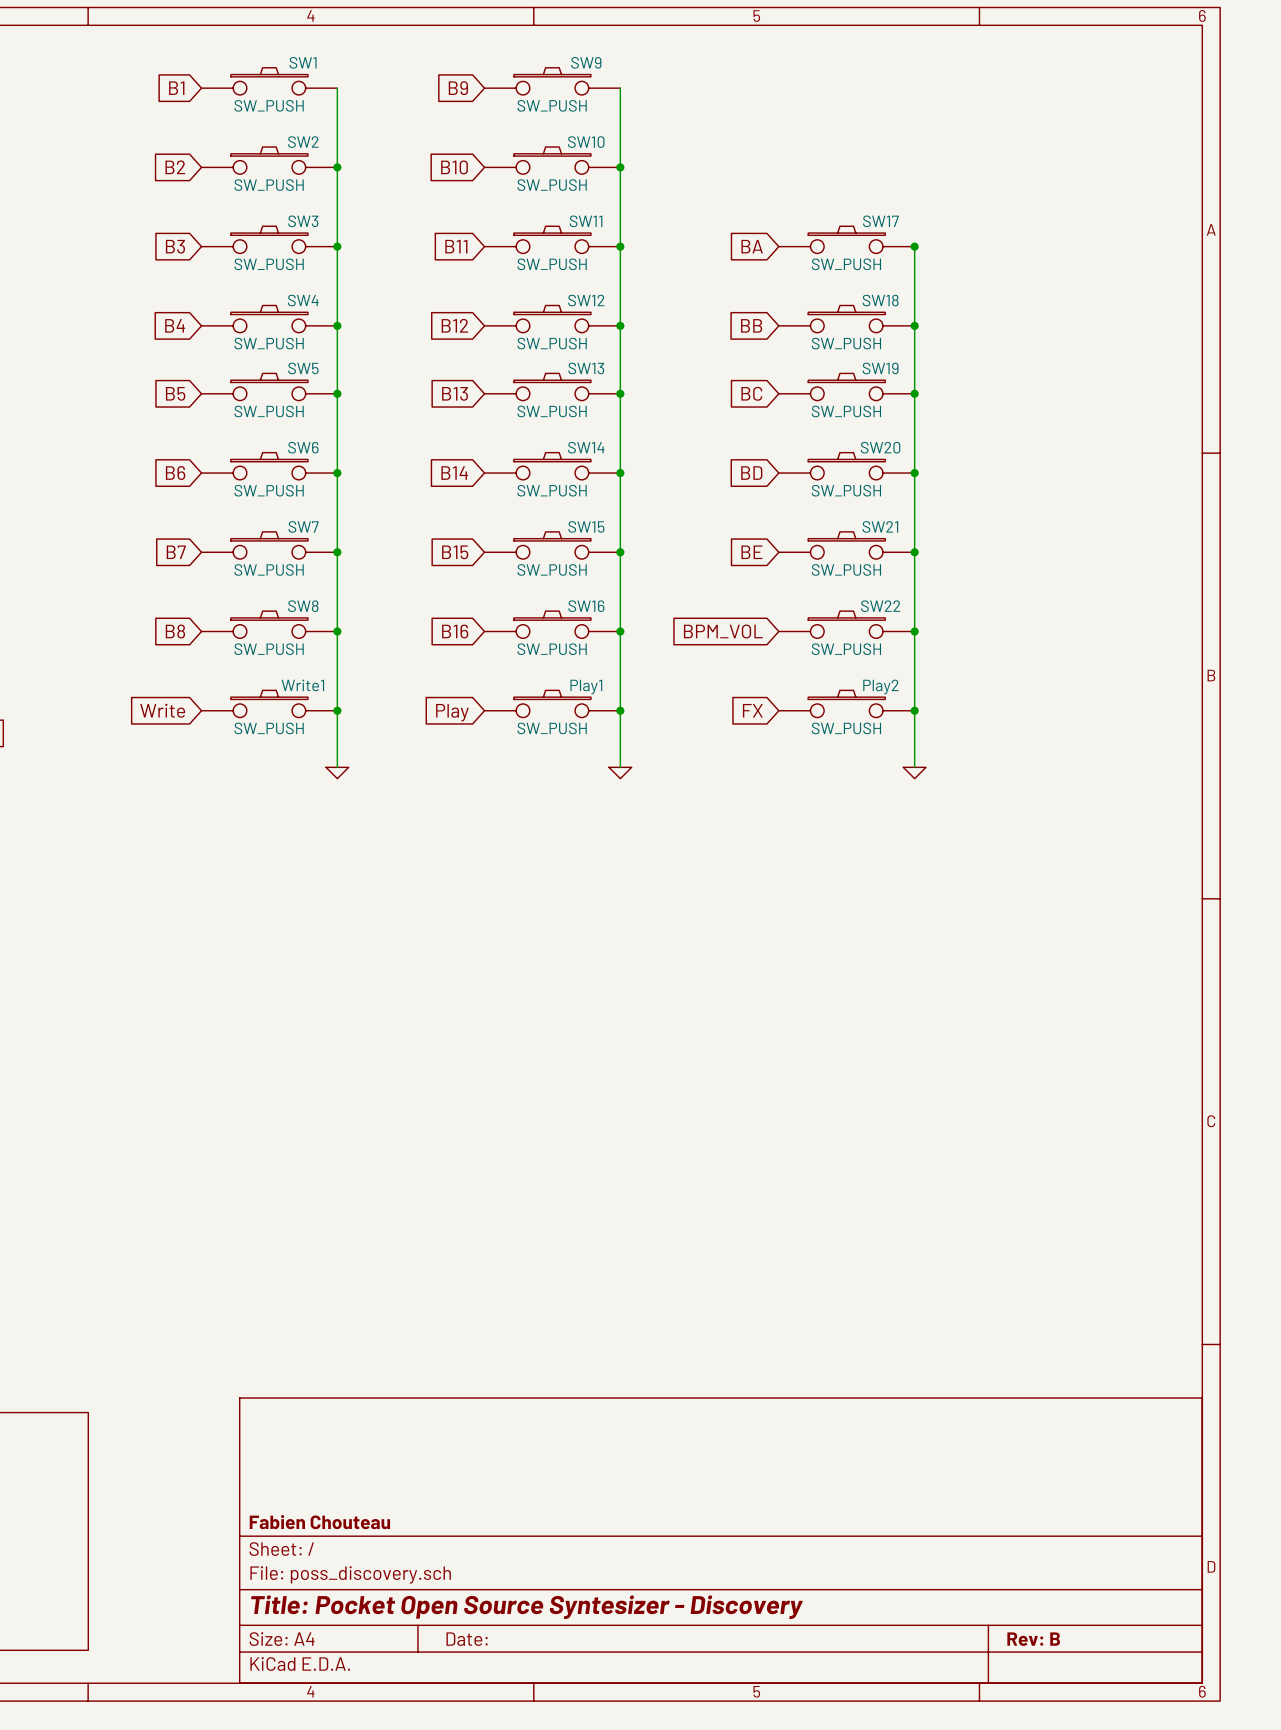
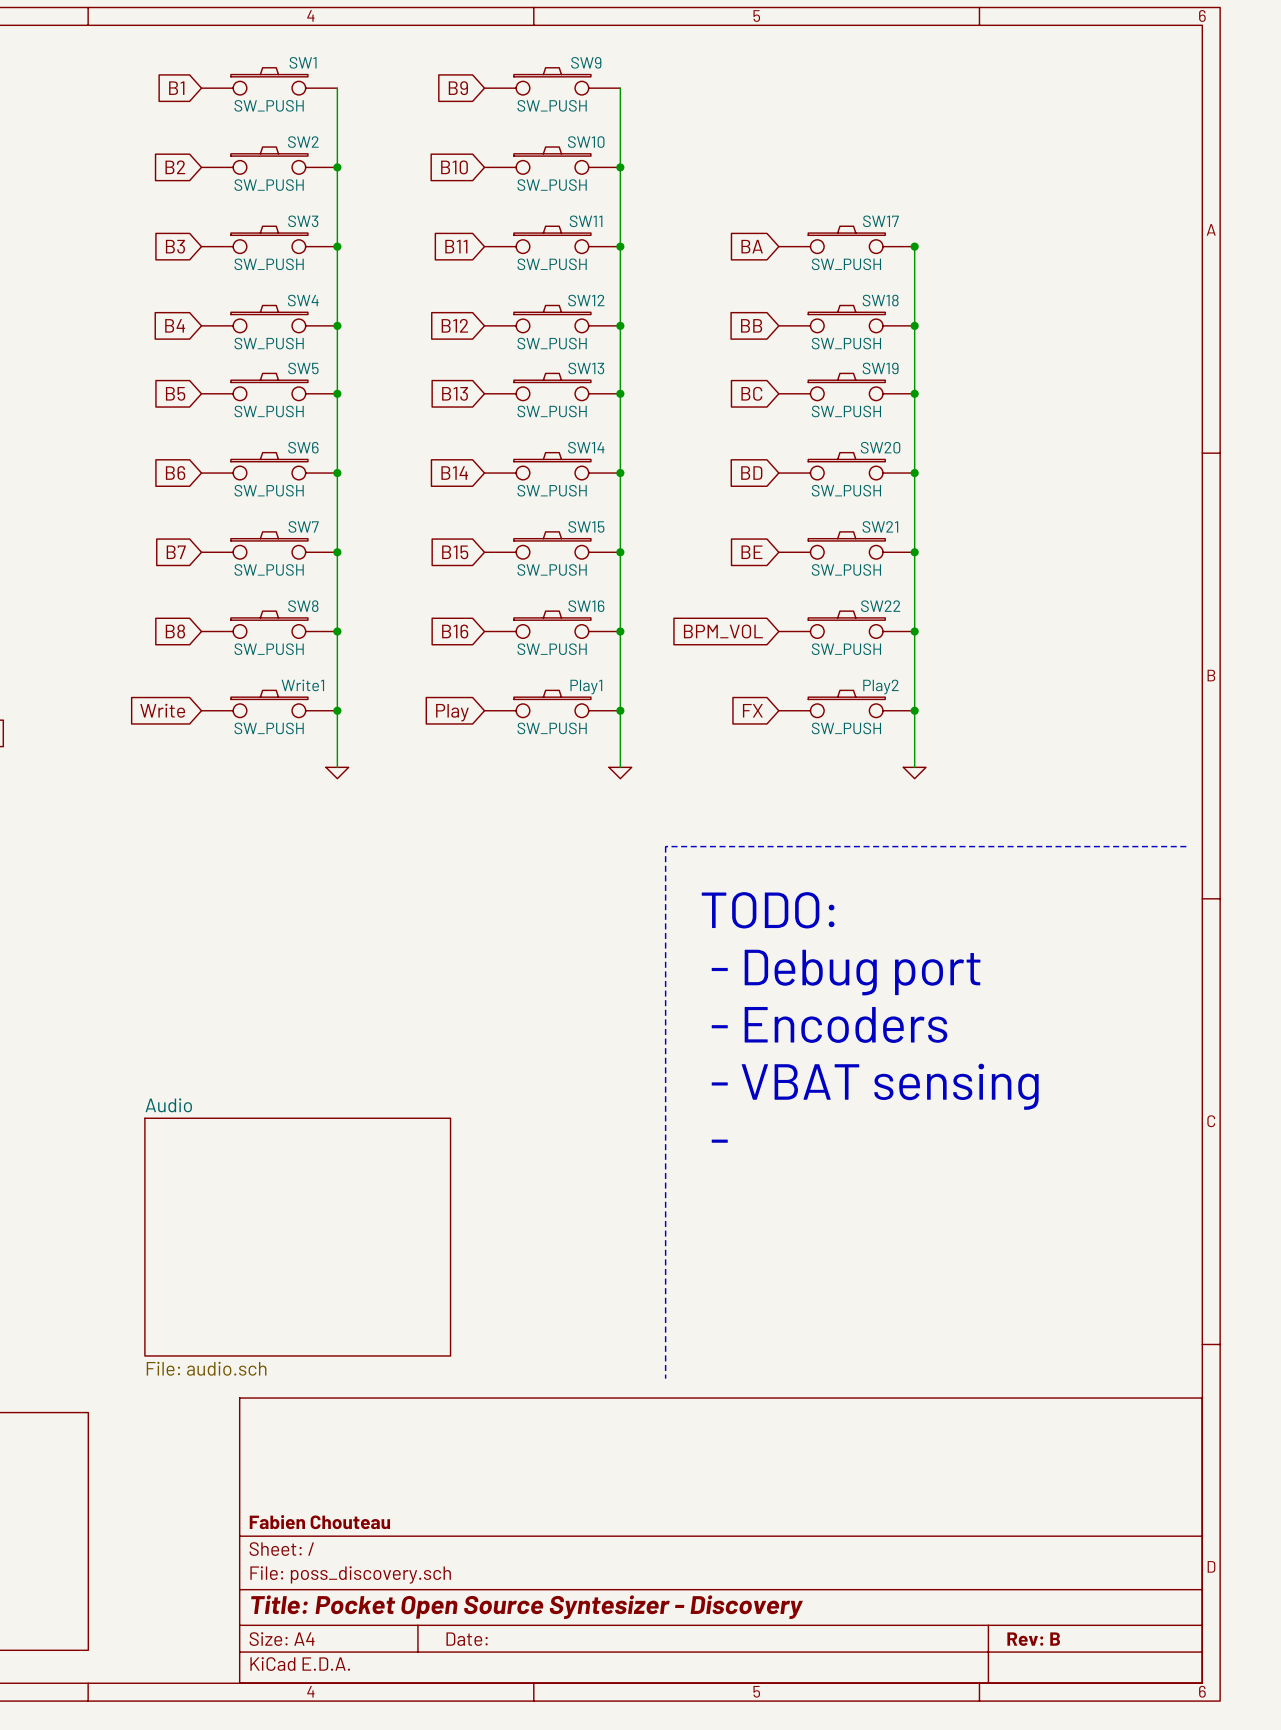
line: none -> (1186, 846) (665, 846) (665, 1378)
text: none -> TODO: (768, 910)
text: none -> - Debug port (846, 972)
text: none -> - Encoders (829, 1024)
text: none -> - VBAT sensing (875, 1086)
text: none -> - (719, 1141)
sheet Audio: none -> File: audio.sch (297, 1237)

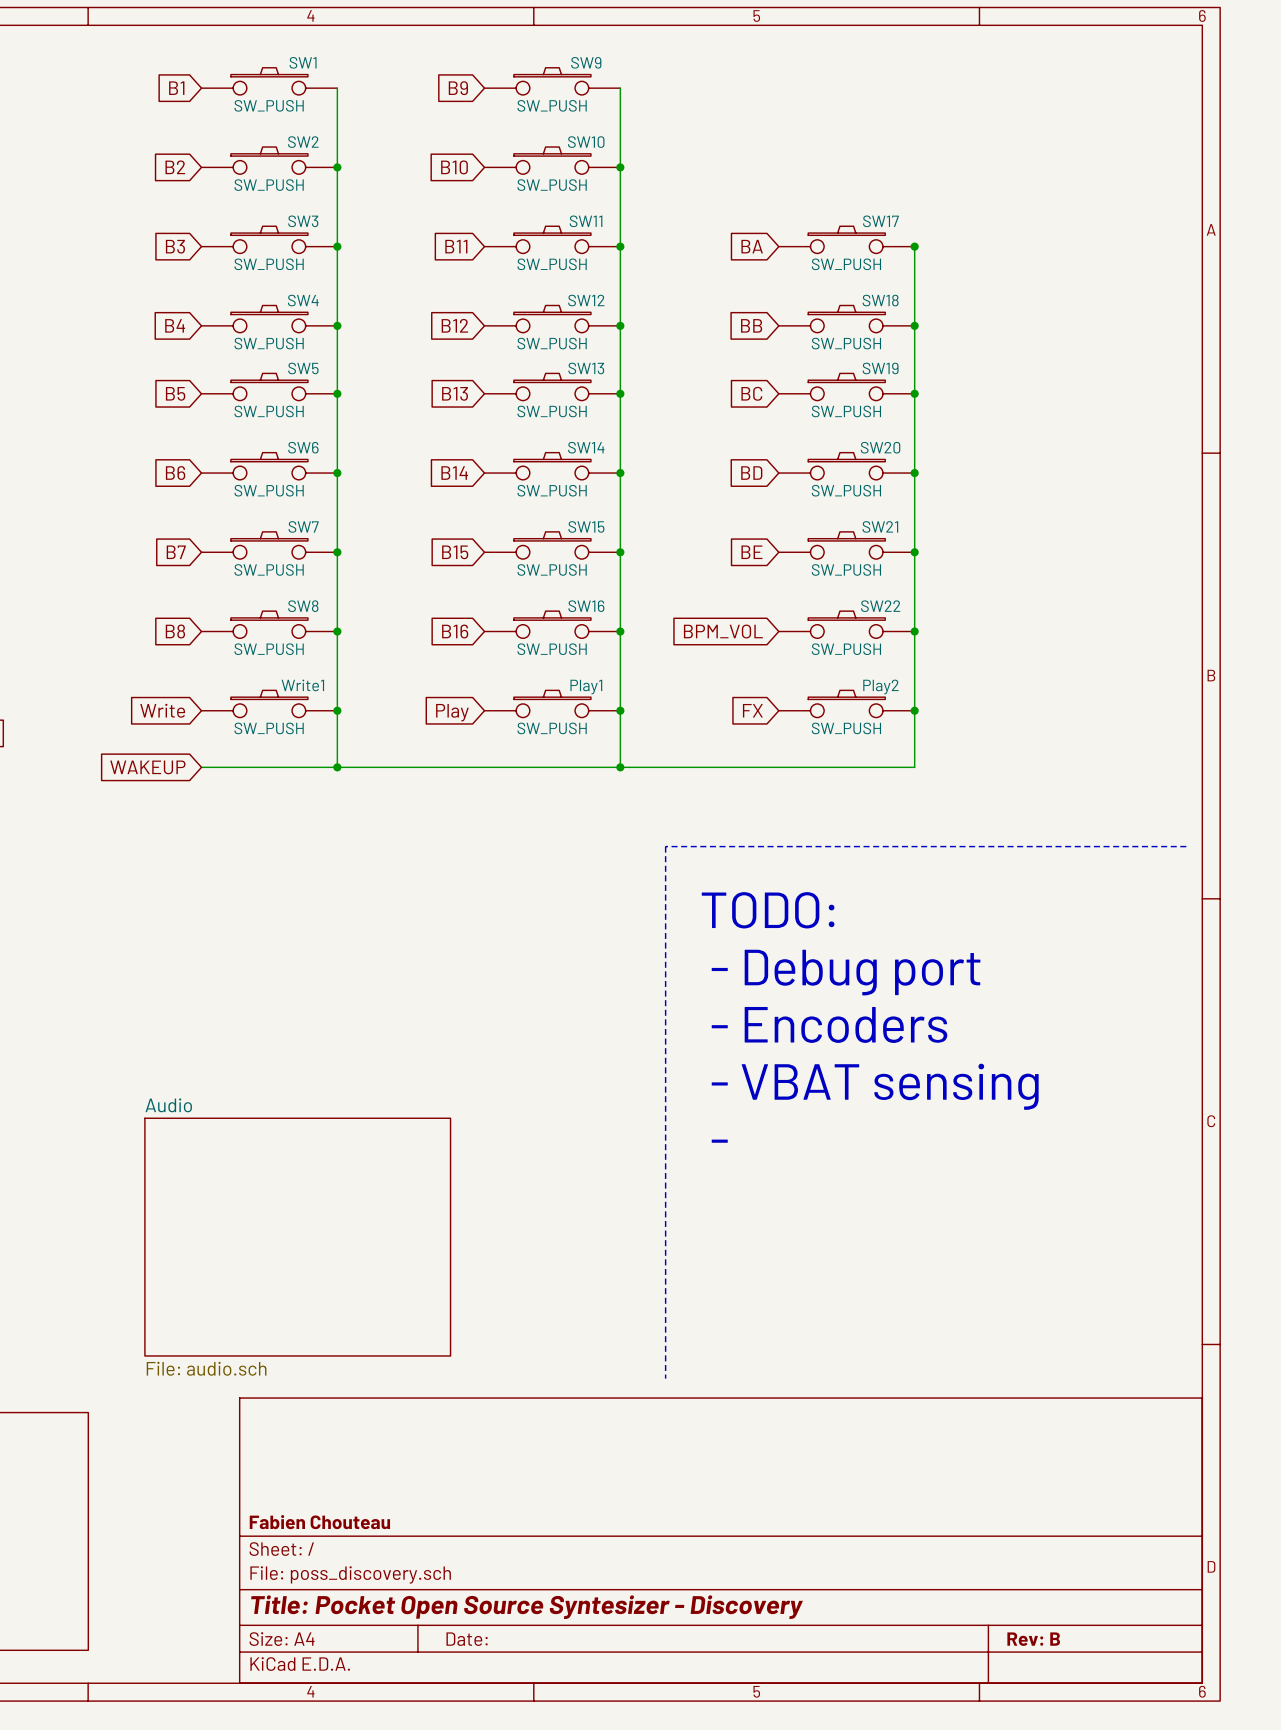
global label: none -> WAKEUP (147, 767)
wire: none -> (201, 767) (914, 767)
junction: none -> (337, 767)
junction: none -> (620, 767)
power symbol: (337, 773) -> none
power symbol: (620, 773) -> none
power symbol: (914, 773) -> none

